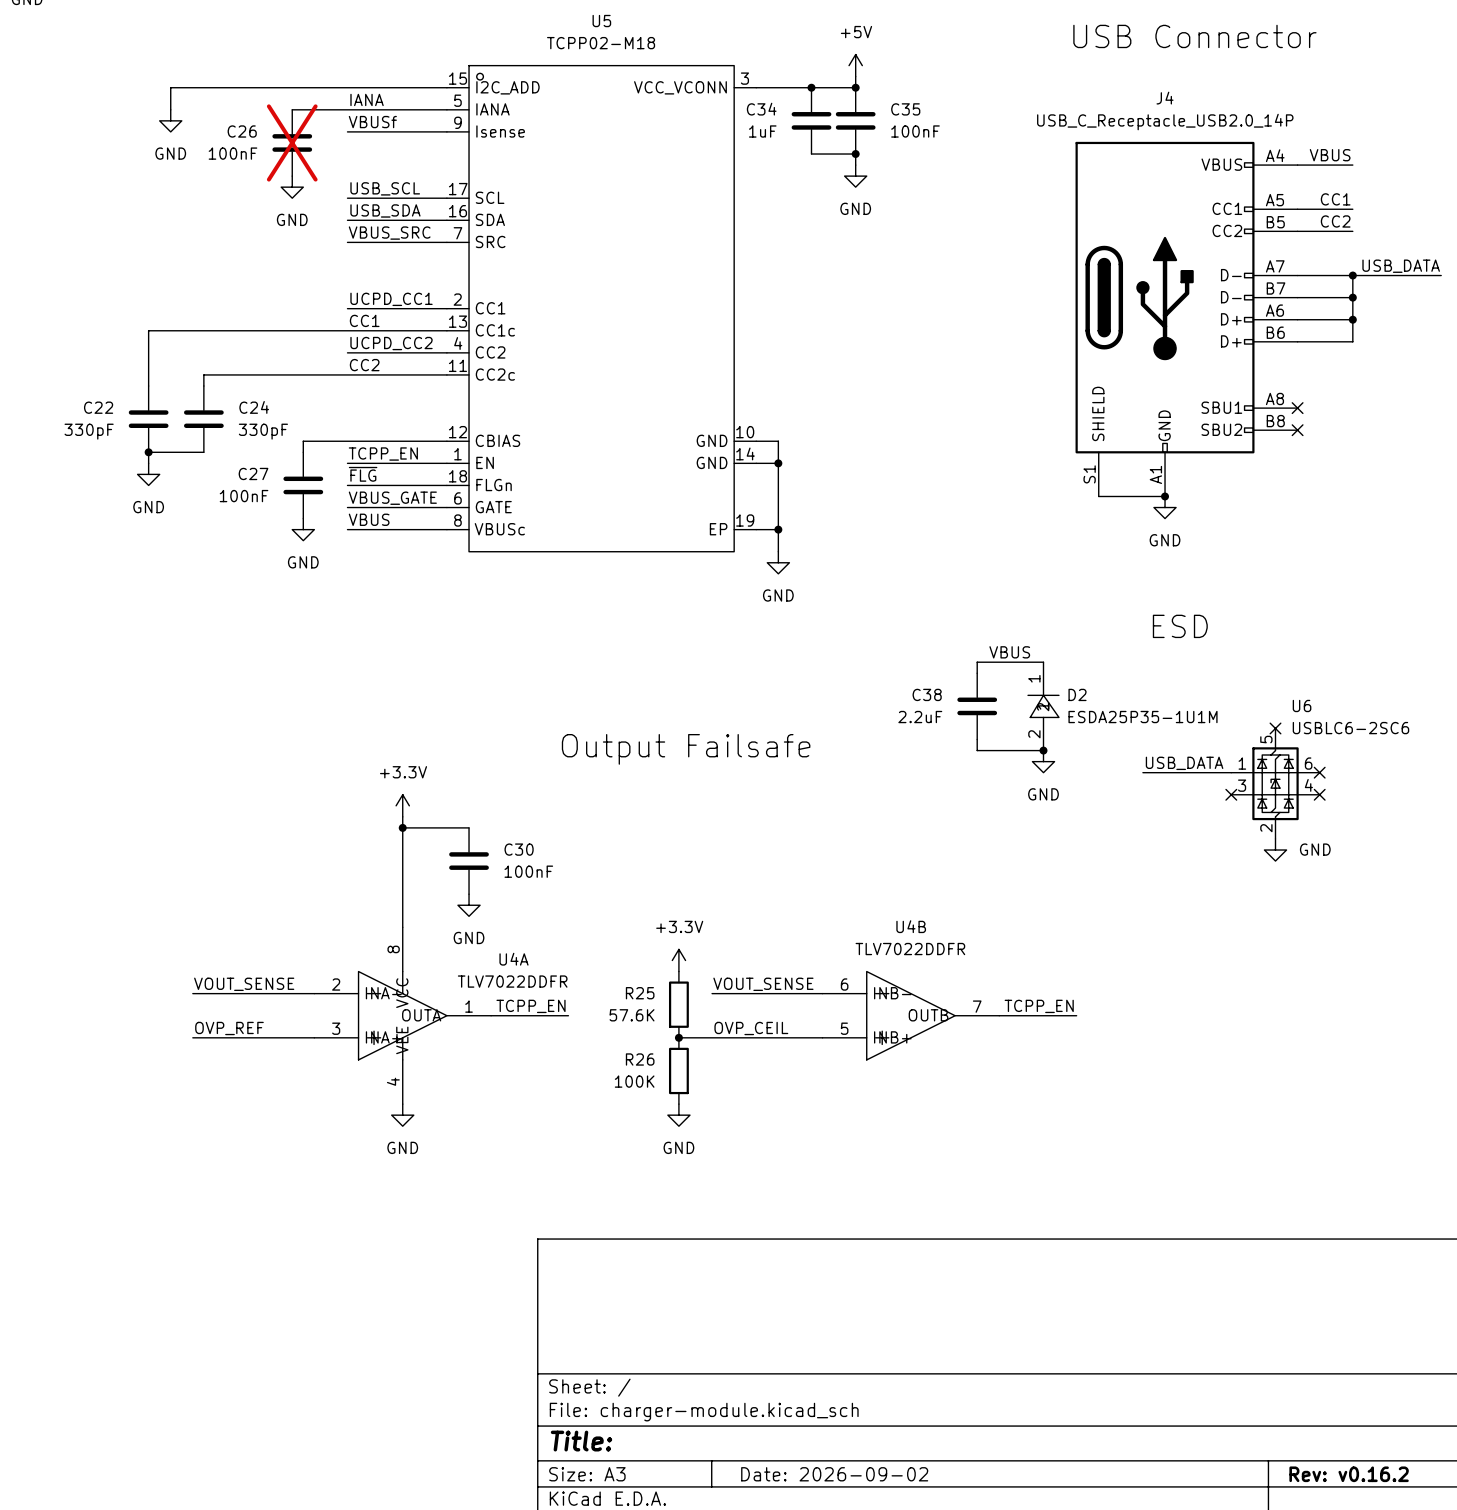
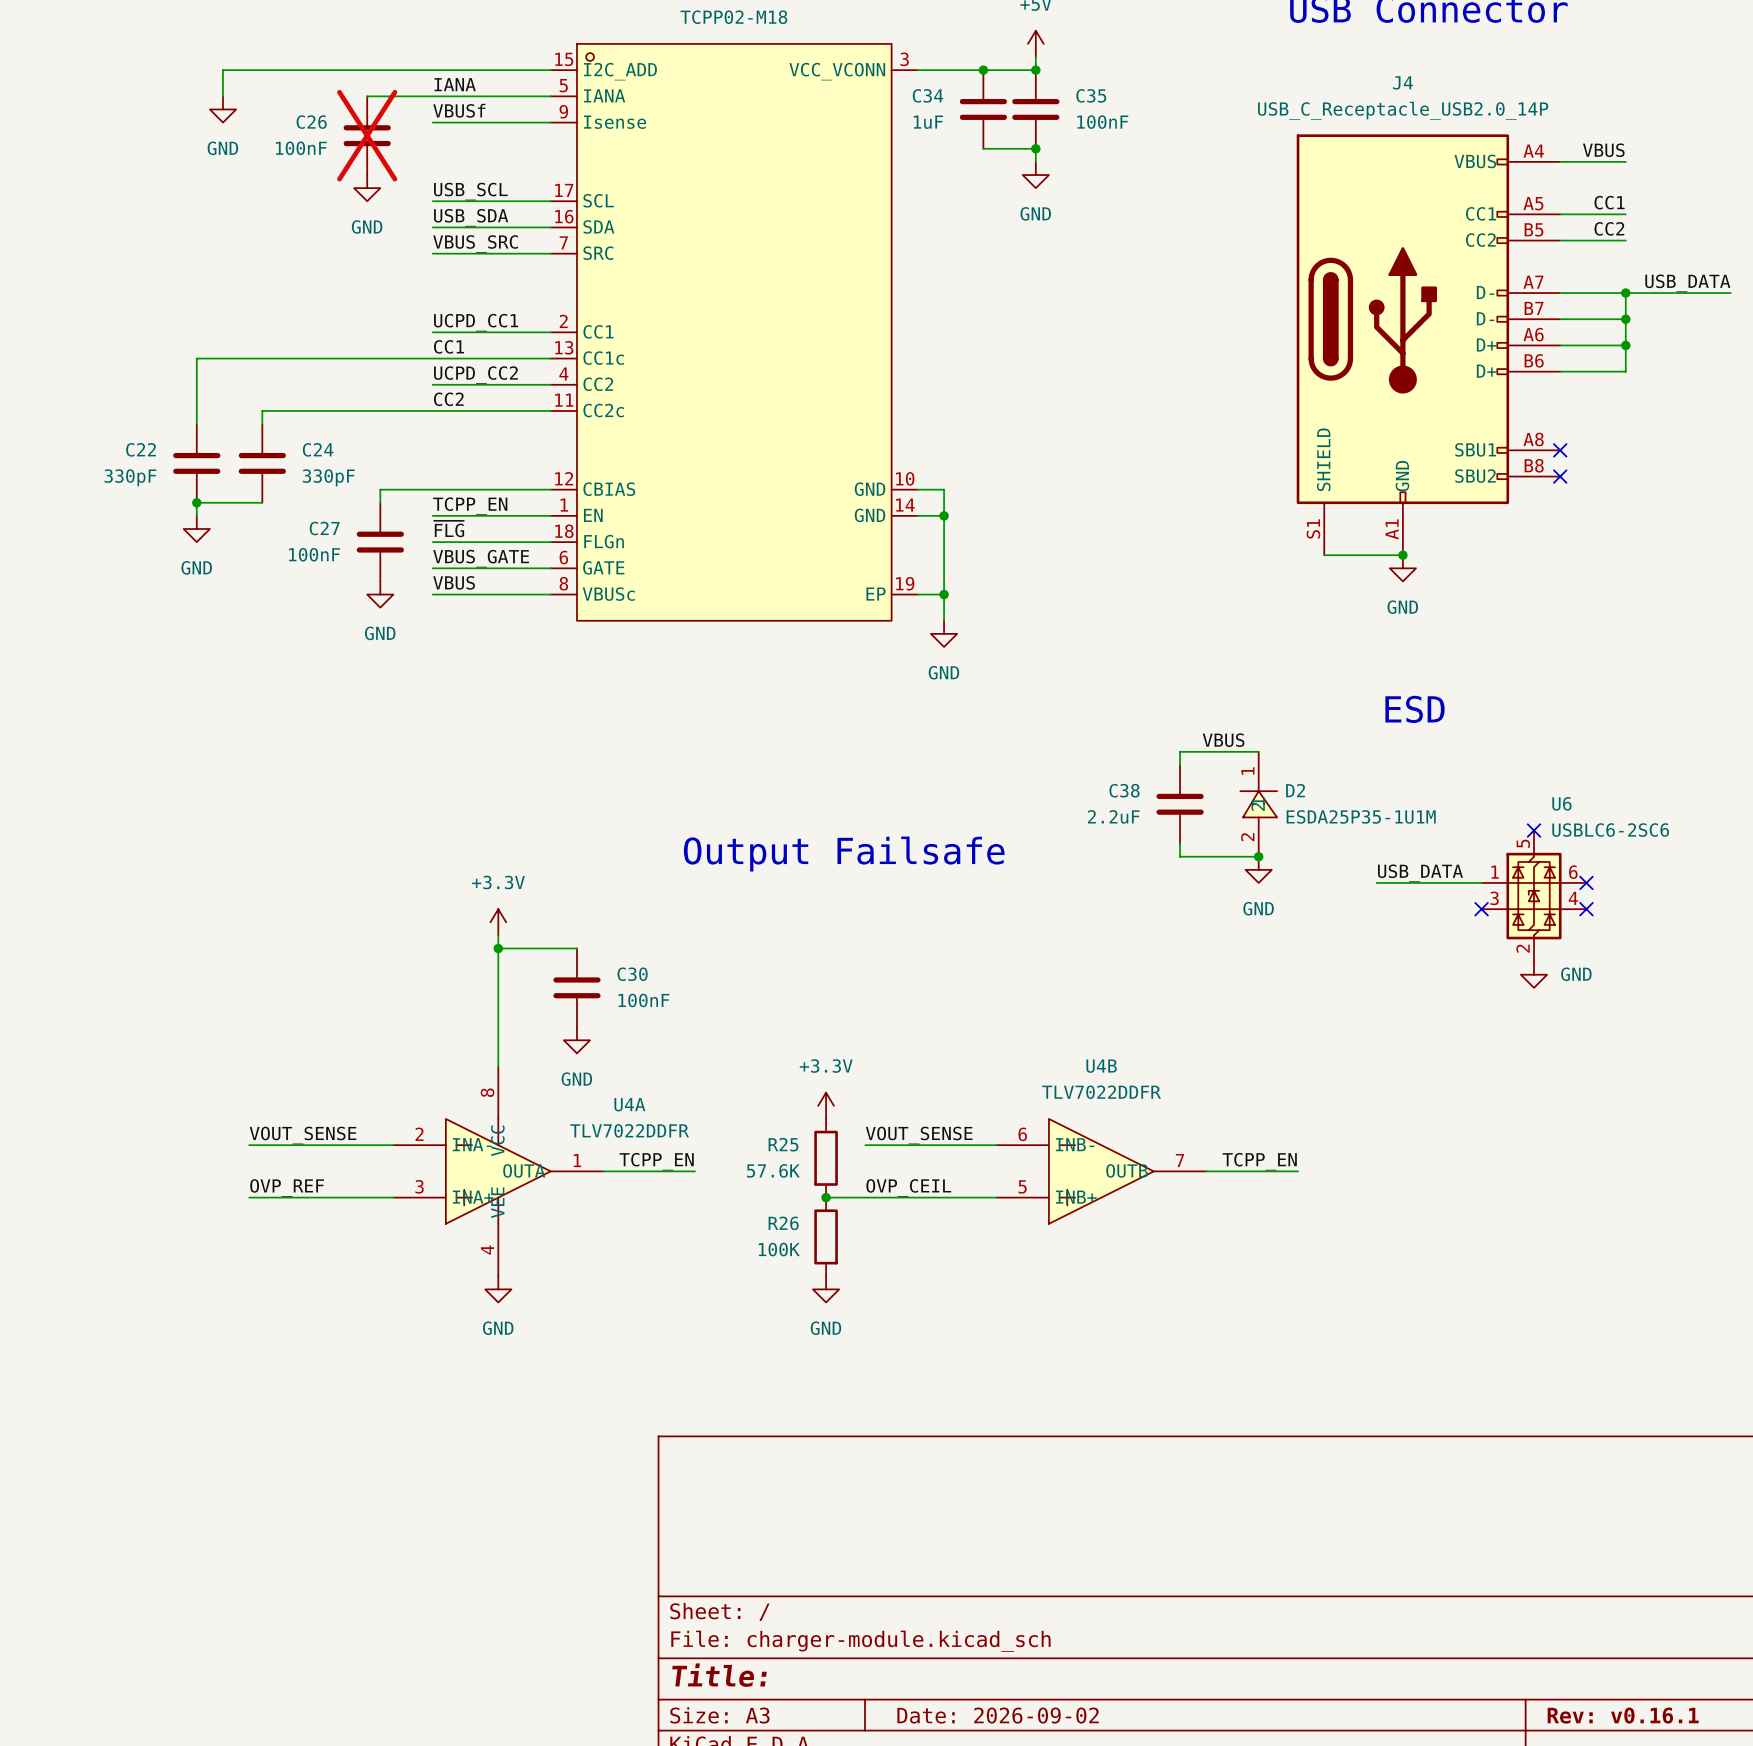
title block: Rev: v0.16.2 (1349, 1474) -> Rev: v0.16.1 (1623, 1715)

